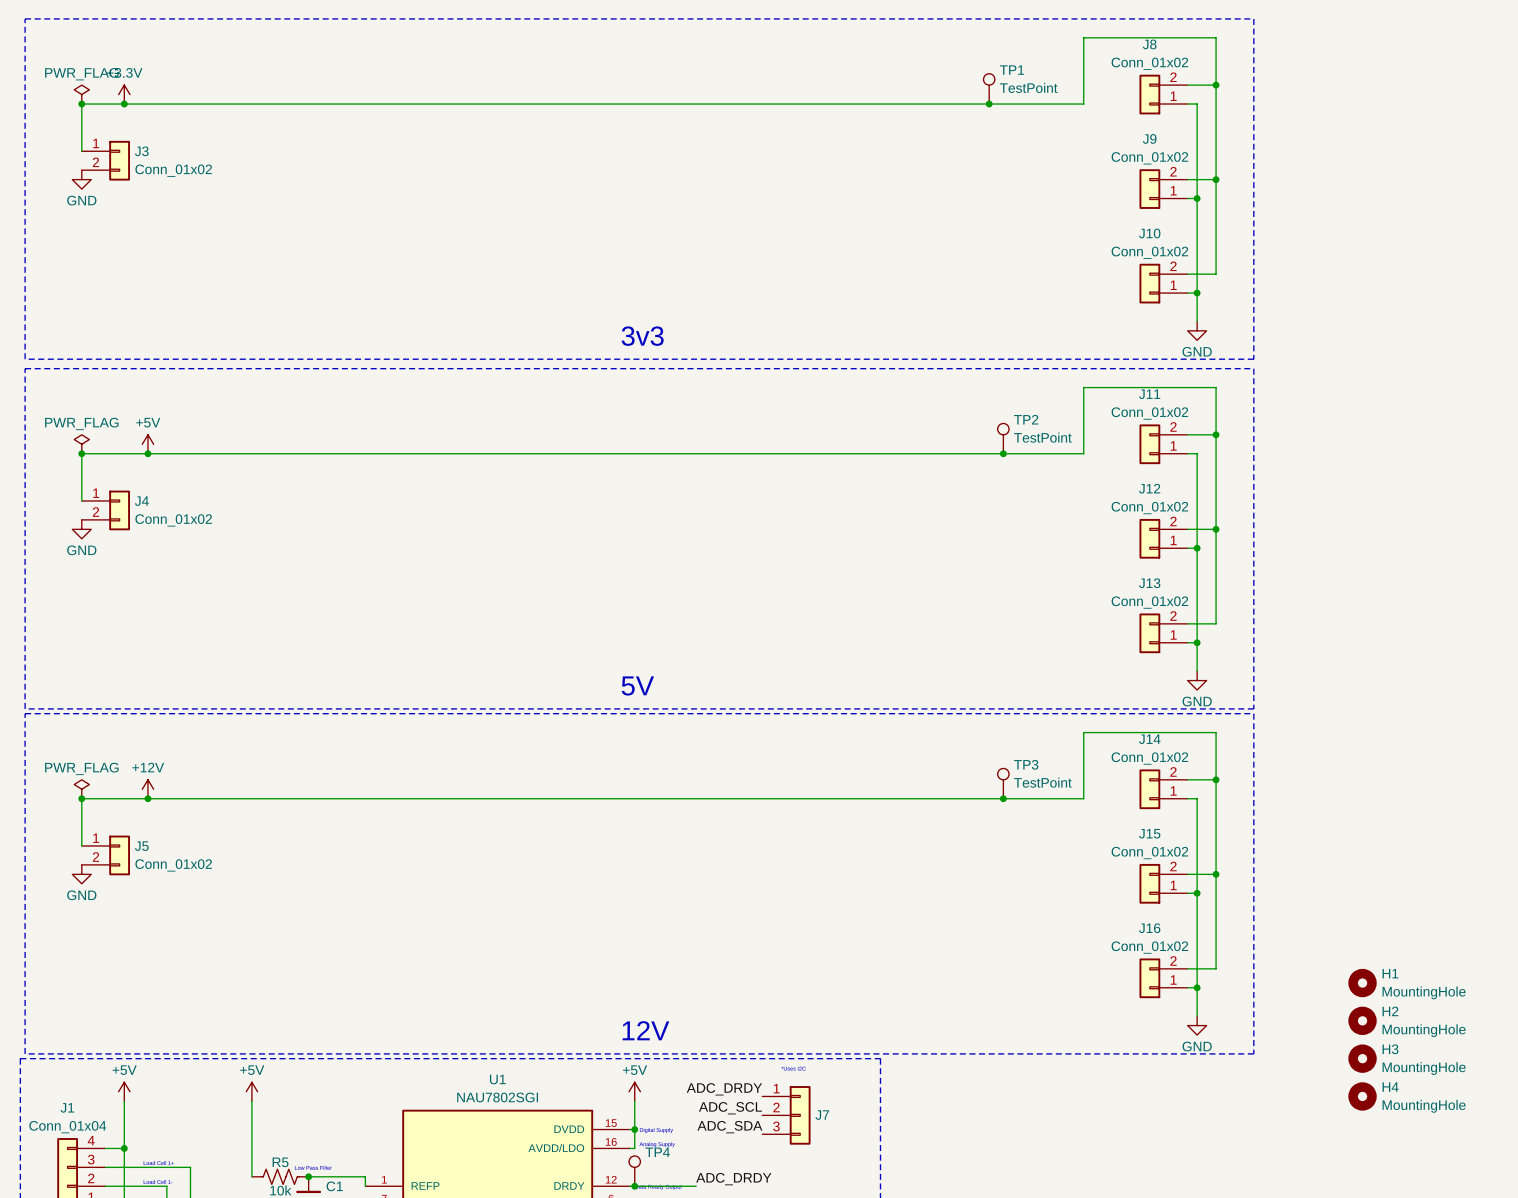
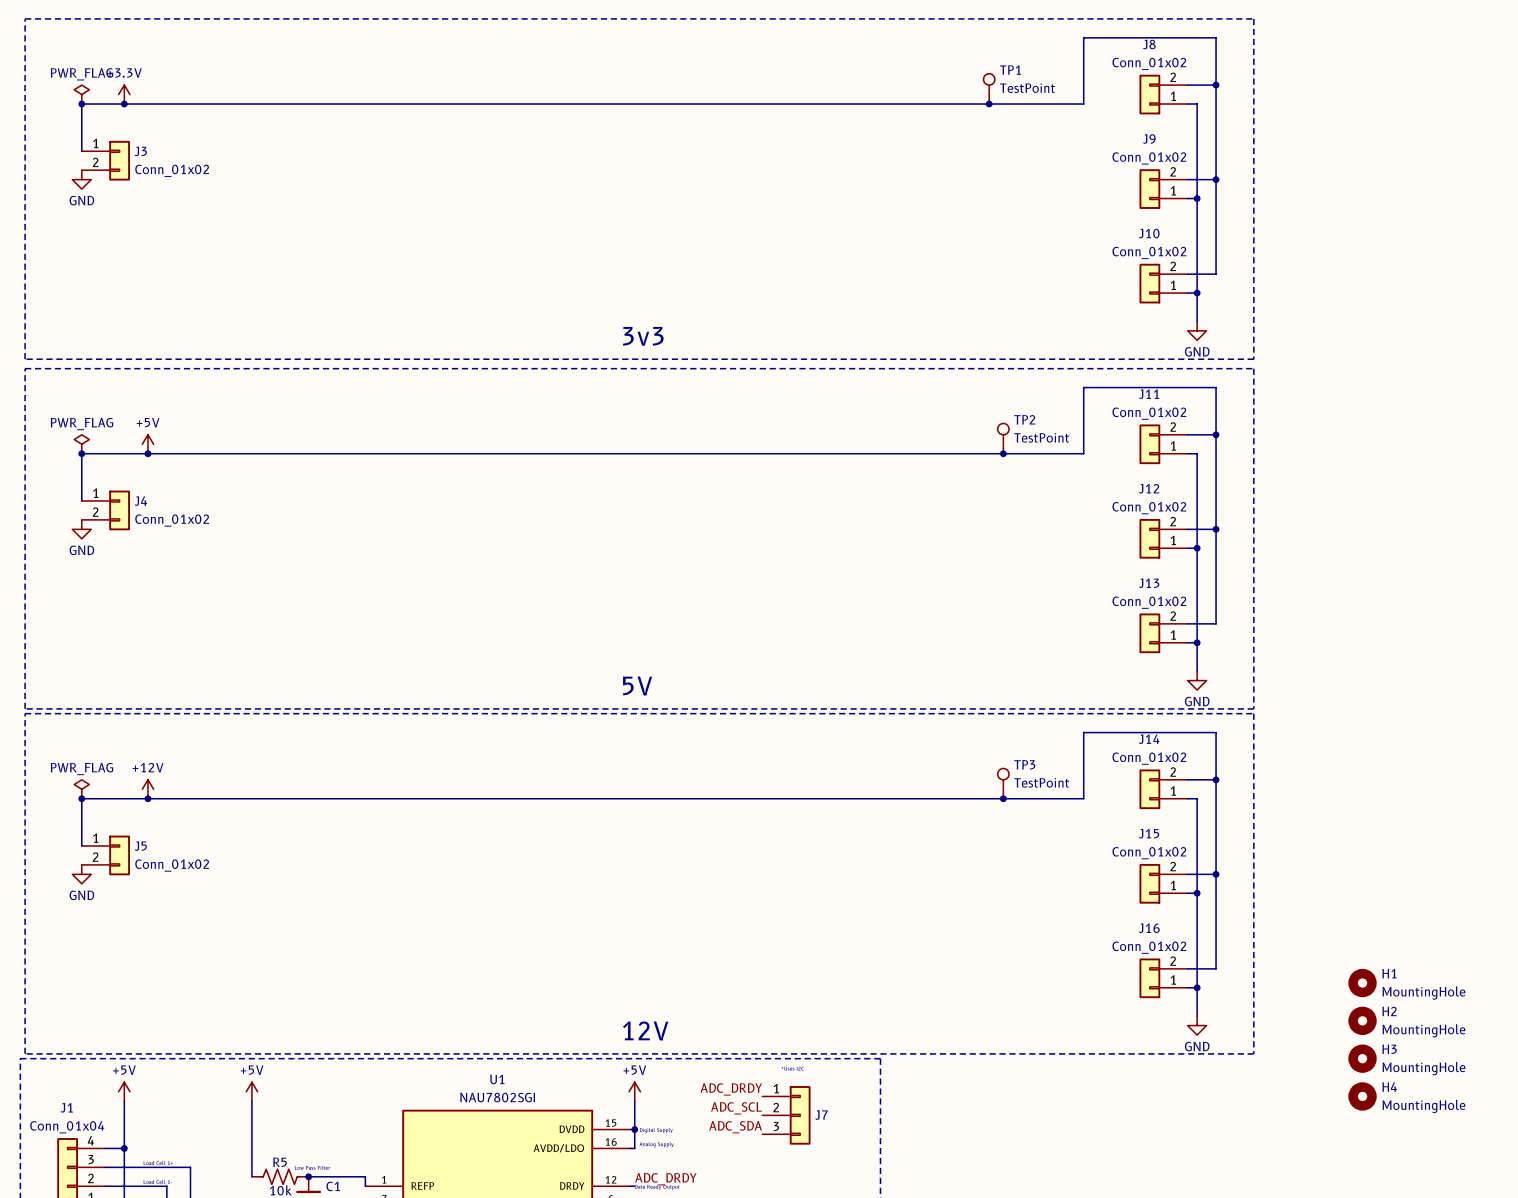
TP4: (634, 1171) -> none
label position: ADC_DRDY (733, 1179) -> ADC_DRDY (665, 1179)
wire: (634, 1186) (696, 1186) -> none
junction: (634, 1186) -> none

